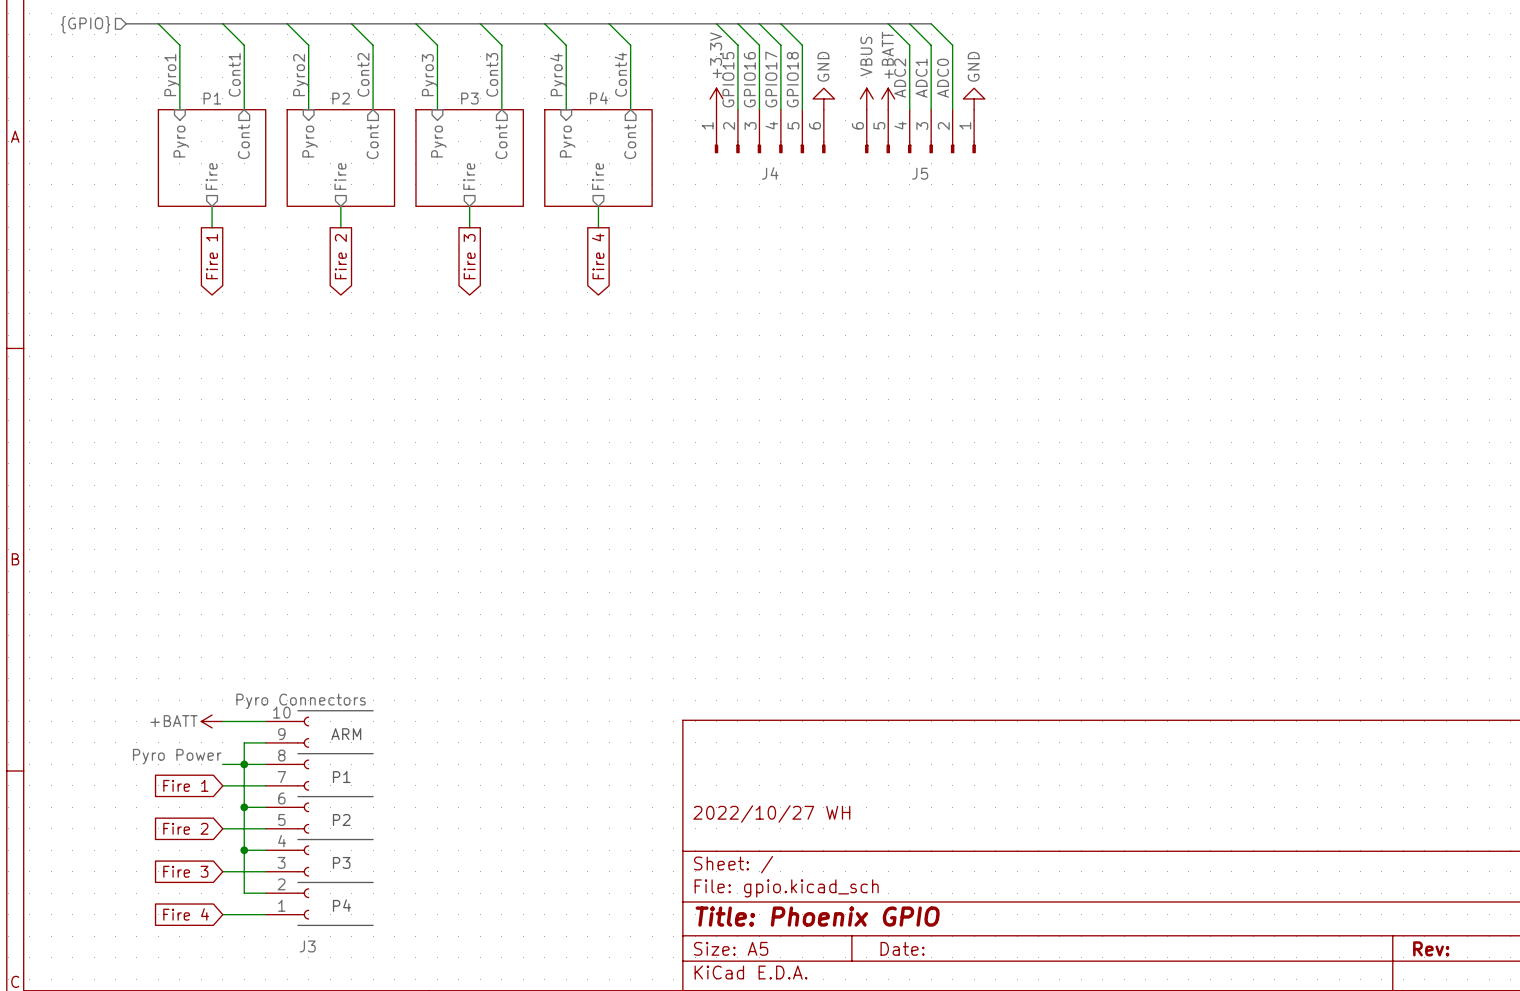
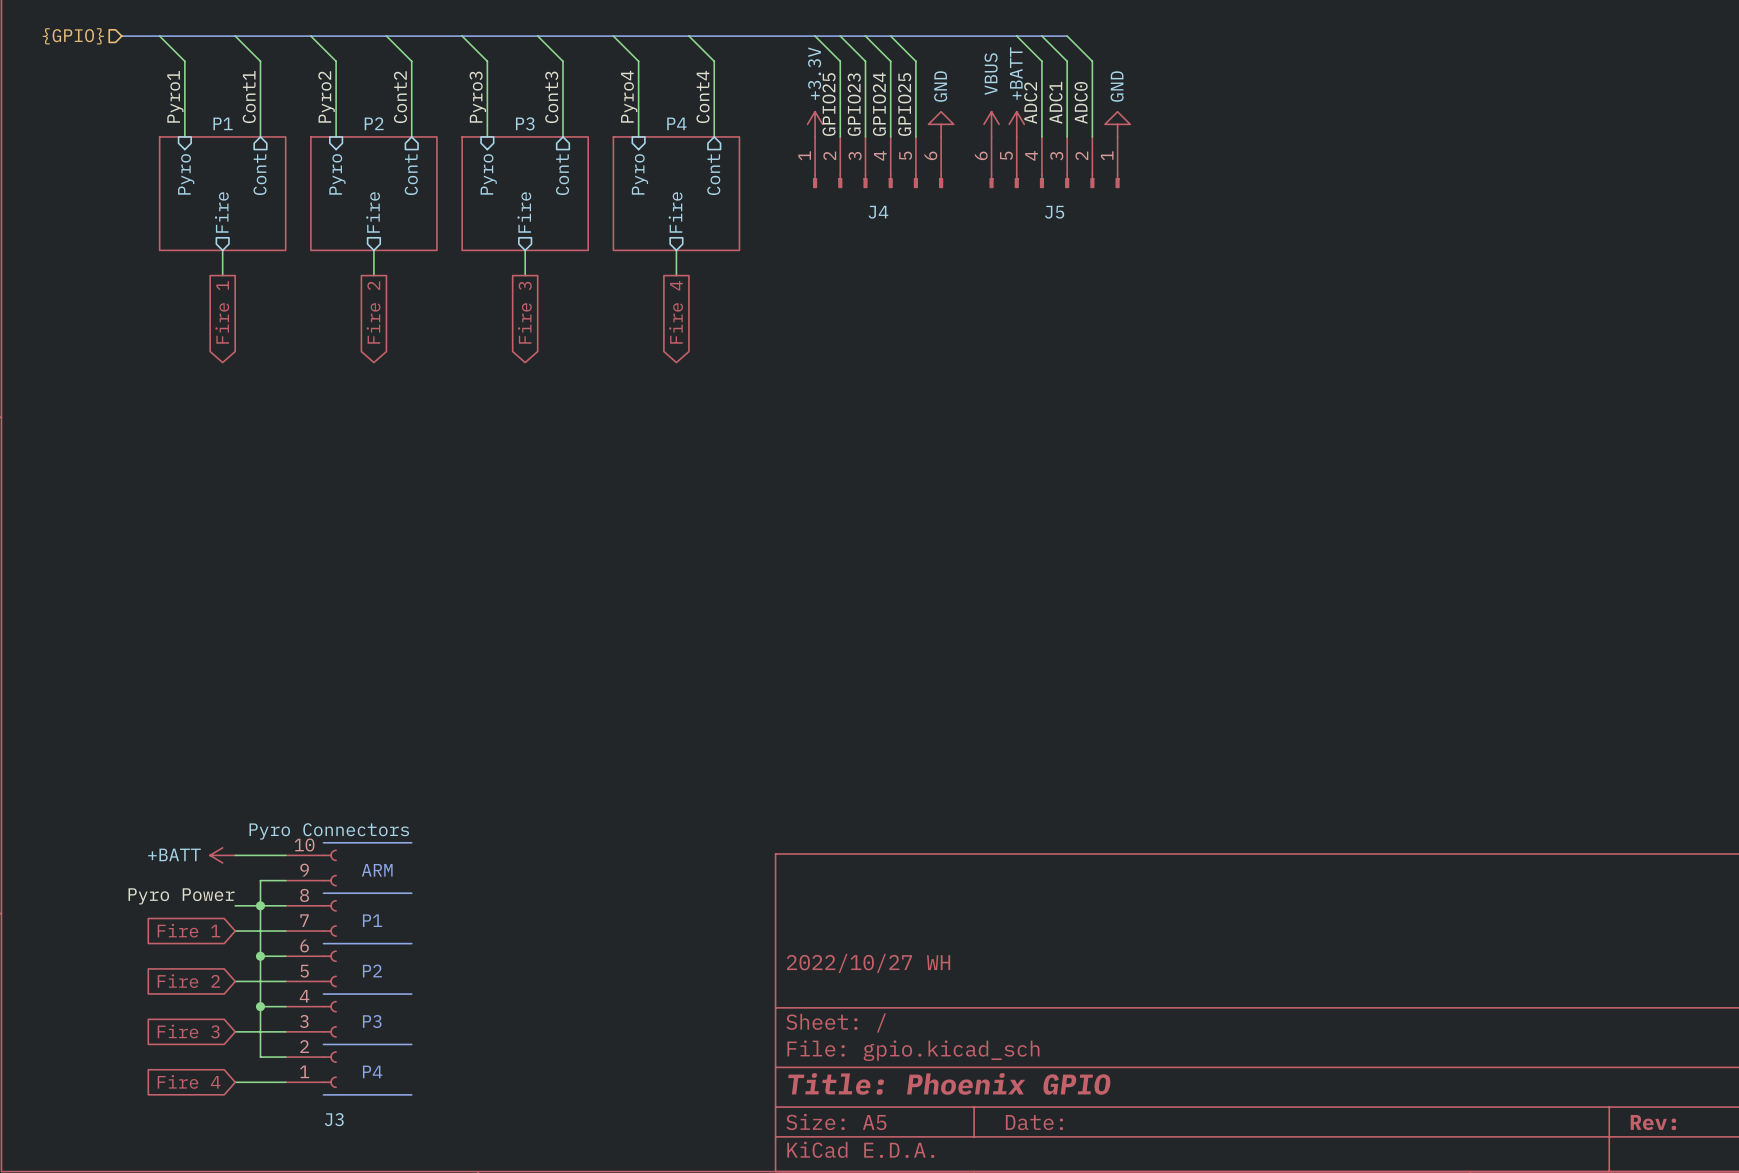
label: GPIO15 (728, 79) -> GPIO25 (829, 104)
label: GPIO16 (749, 79) -> GPIO23 (854, 104)
label: GPIO17 (771, 79) -> GPIO24 (879, 104)
label: GPIO18 (792, 79) -> GPIO25 (904, 104)

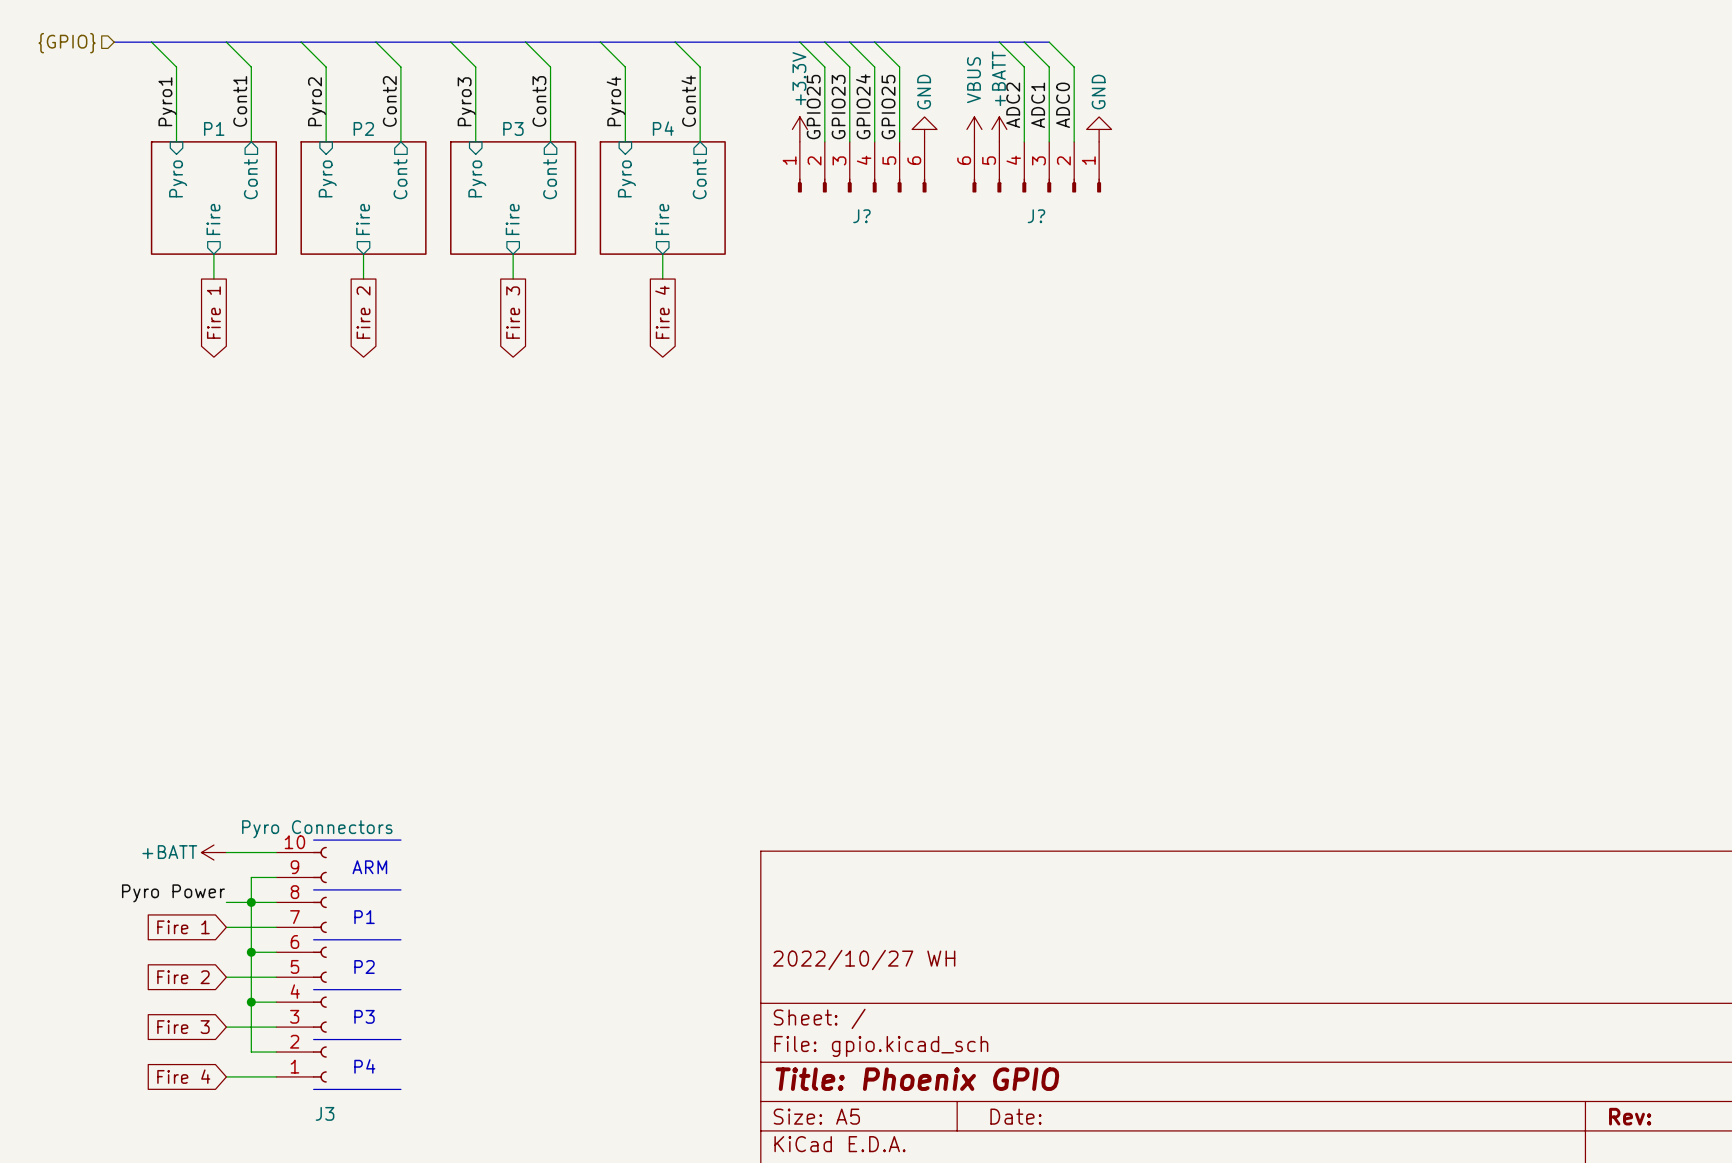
J4 name: J4 (878, 212) -> J? (861, 216)
J5 name: J5 (1054, 212) -> J? (1036, 216)

